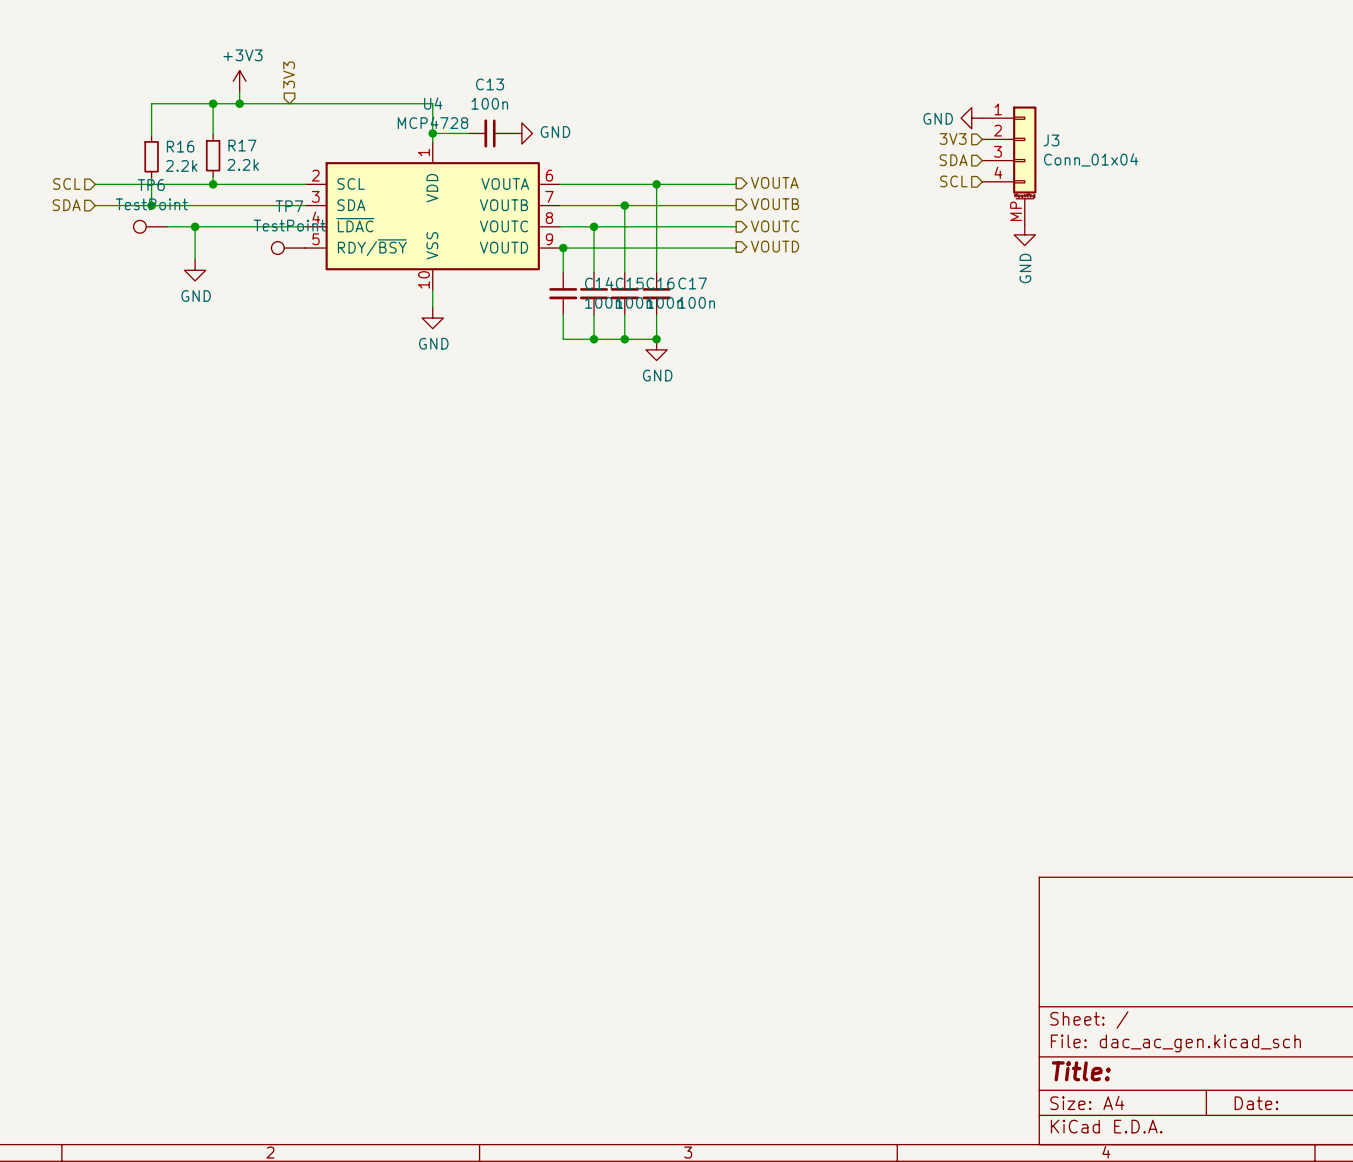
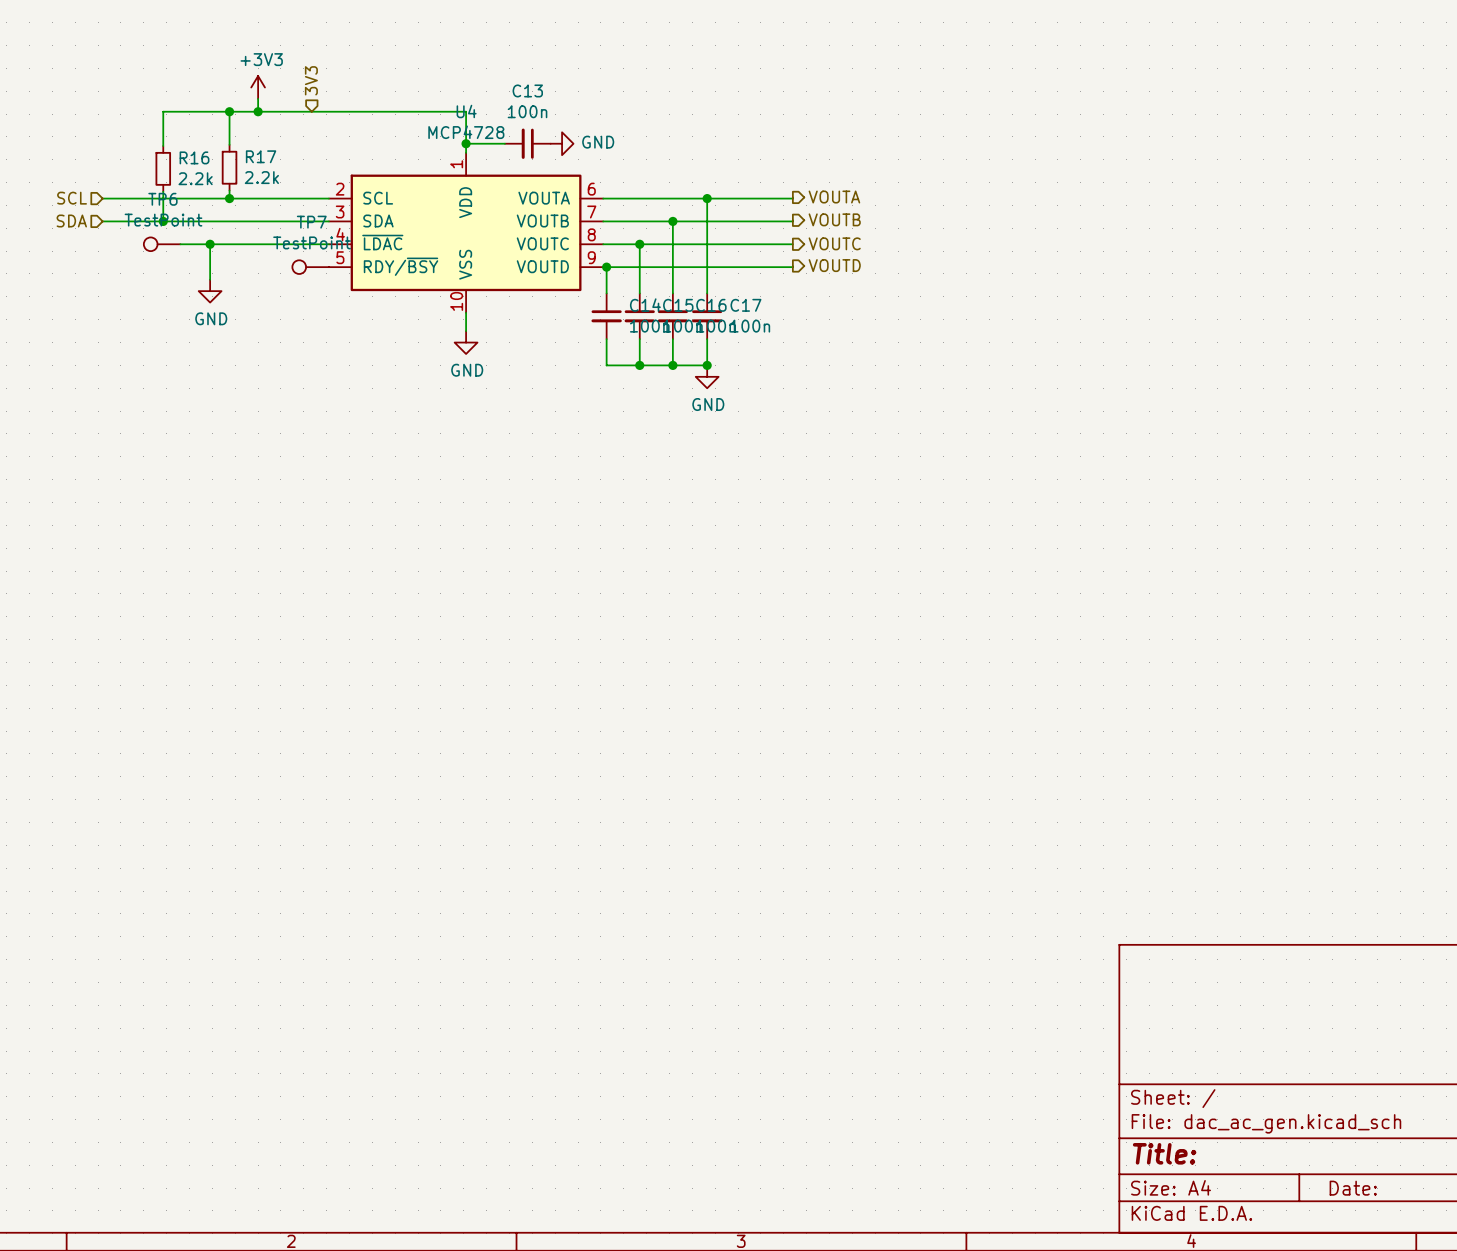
power symbol: GND (971, 118) -> none
hierarchical label: 3V3 (953, 138) -> none
hierarchical label: SDA (953, 160) -> none
J3: Conn_01x04 (1009, 165) -> none
hierarchical label: SCL (953, 181) -> none
power symbol: GND (1024, 234) -> none

